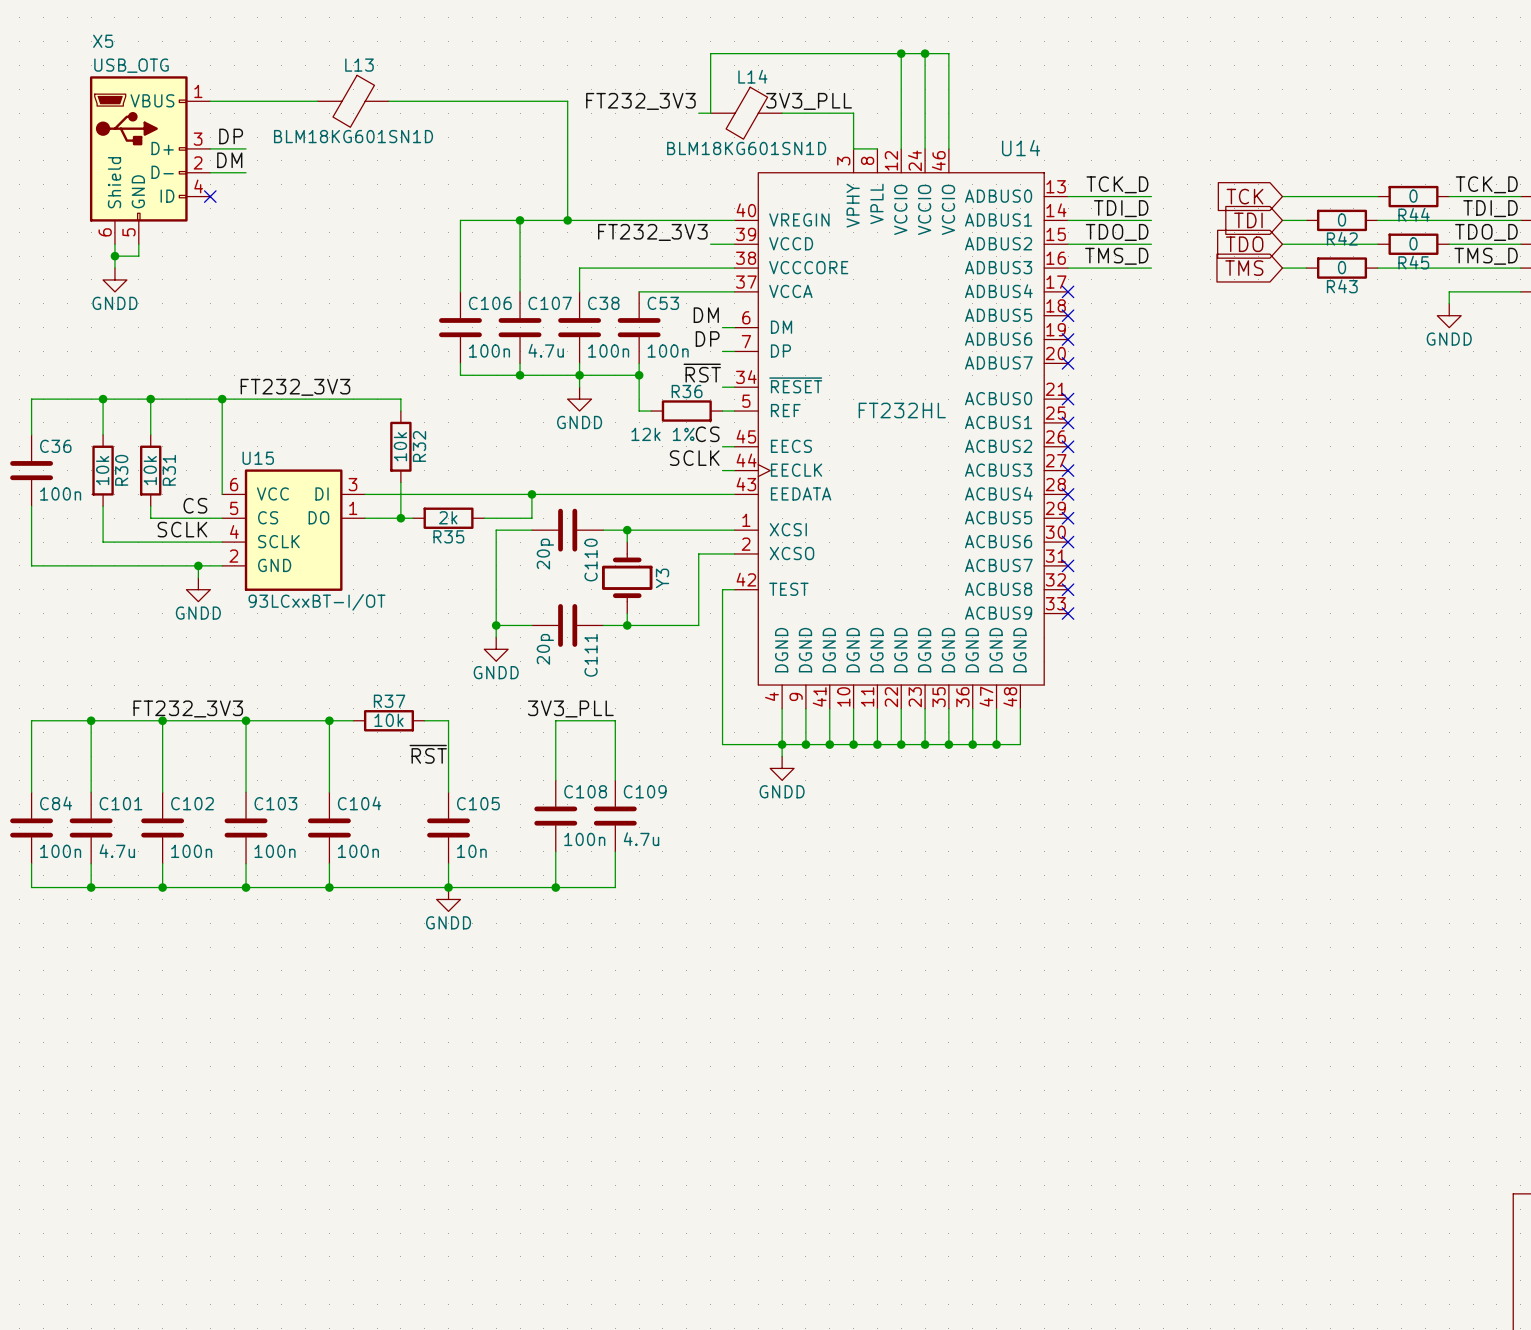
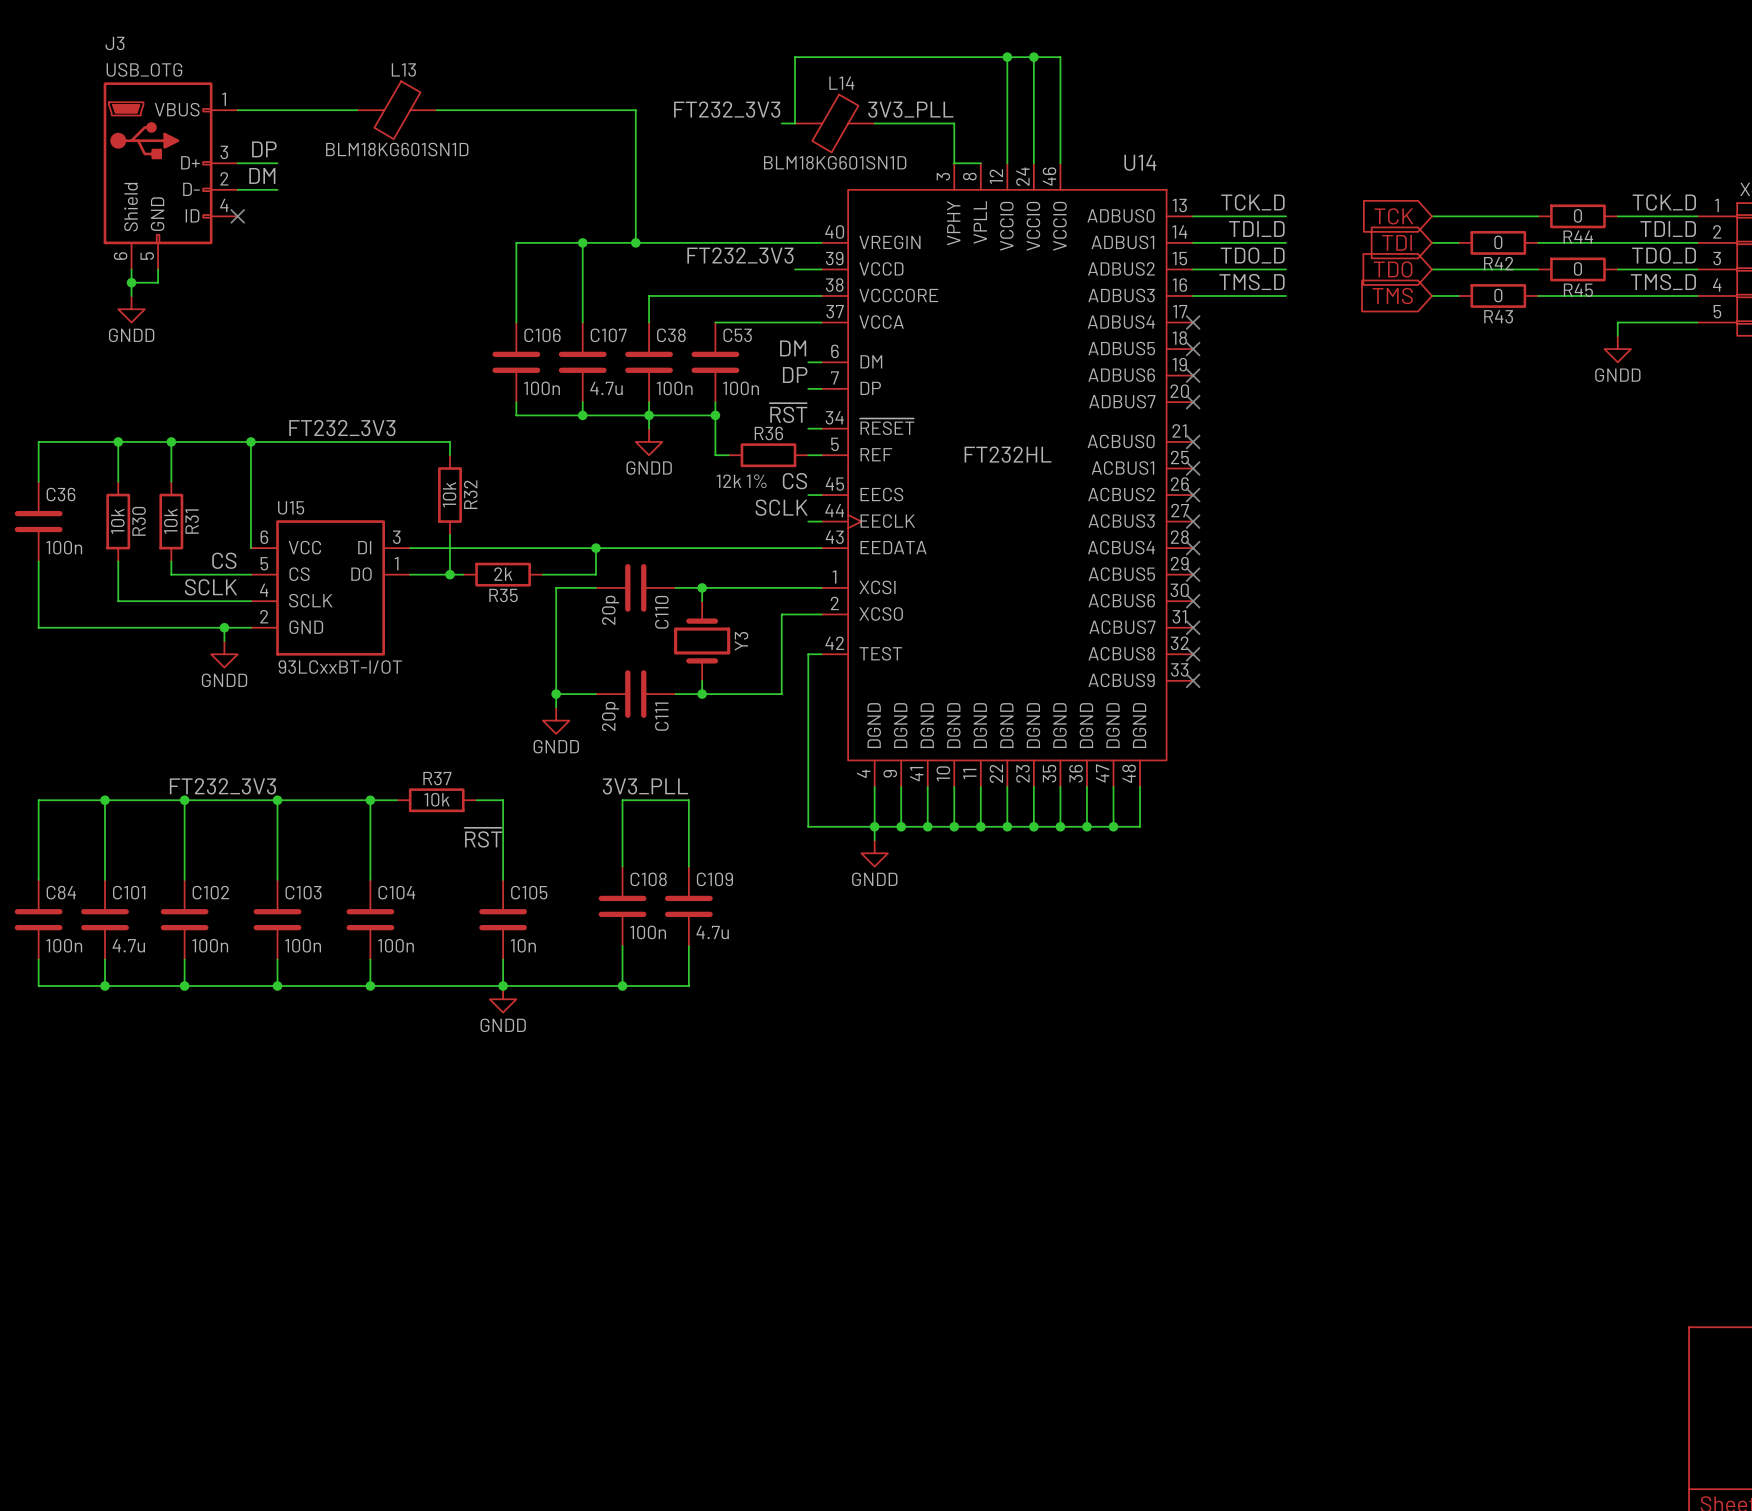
X5 name: X5 (103, 41) -> J3 (115, 43)

